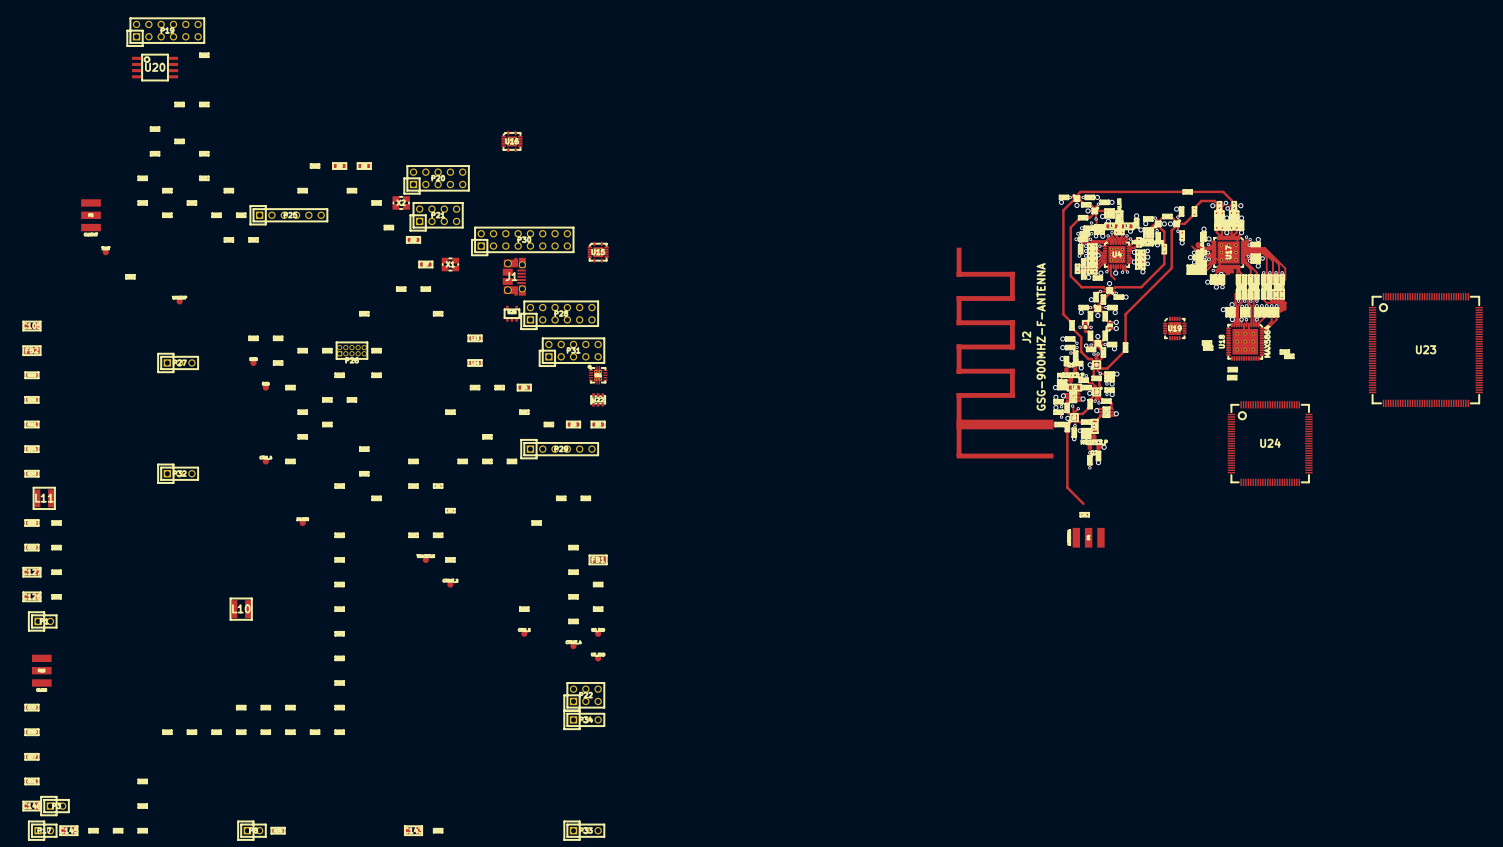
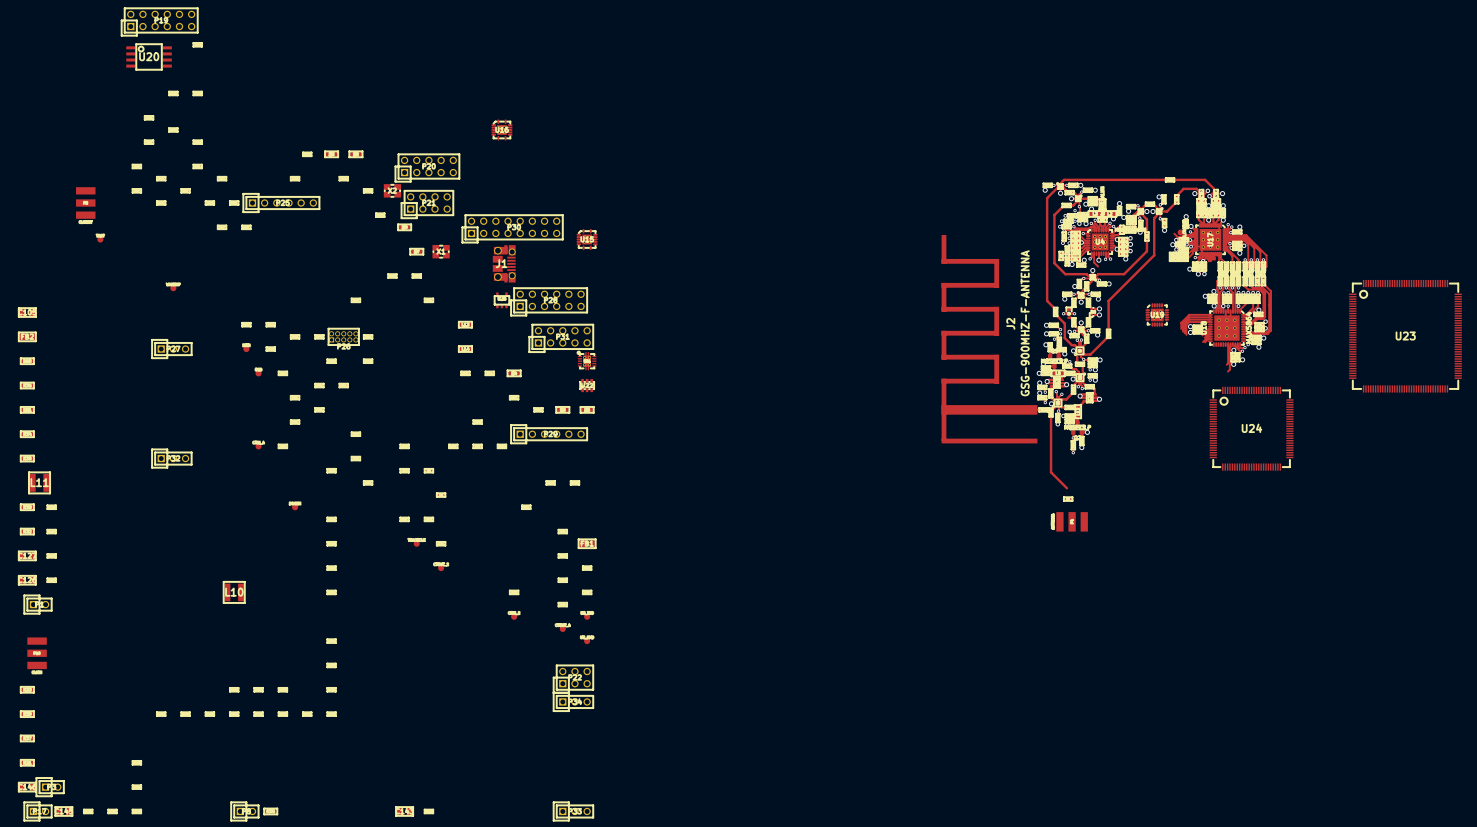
part position: (130, 276) -> (1258, 314)
track: (1276, 296) (1283, 303) (1283, 310) -> (1257, 283) (1269, 294) (1269, 329) (1266, 332) (1243, 331)
track: (1282, 296) (1285, 302) (1285, 309) -> (1263, 283) (1270, 291) (1270, 330) (1267, 334) (1247, 334)
track: (1282, 304) (1282, 311) -> (1263, 291) (1265, 292) (1265, 317) (1257, 319) (1251, 324) (1243, 324)
track: (1280, 305) (1280, 311) -> (1261, 291) (1263, 293) (1263, 316) (1256, 317) (1251, 322) (1243, 322)
via: none -> (1258, 310)
track: none -> (1210, 314) (1189, 314) (1181, 322) (1181, 328)
track: none -> (1210, 317) (1189, 317) (1183, 323) (1183, 331)
track: none -> (1210, 319) (1189, 319) (1184, 324) (1184, 333)
track: none -> (1210, 322) (1189, 322) (1186, 324) (1186, 334)
via: none -> (1265, 321)
via: none -> (1190, 326)
part: (1207, 342) -> none
track: none -> (1210, 329) (1202, 335)
via: none -> (1265, 328)
track: none -> (1210, 331) (1205, 335)
via: none -> (1190, 332)
track: none -> (1210, 334) (1204, 337)
part: (1208, 348) -> none
track: none -> (1210, 336) (1203, 341)
via: none -> (1263, 338)
track: none -> (1210, 338) (1205, 342)
part position: (1284, 352) -> (1259, 324)
part position: (1289, 356) -> (1259, 329)
track: none -> (1228, 344) (1226, 364)
track: none -> (1230, 344) (1229, 369) (1227, 371)
track: none -> (1235, 344) (1240, 351) (1242, 351)
track: none -> (1237, 344) (1239, 348) (1245, 347)
via: none -> (1248, 344)
via: none -> (1245, 347)
via: none -> (1258, 347)
via: none -> (1233, 350)
via: none -> (1242, 351)
part position: (1232, 369) -> (1256, 337)
part: none -> (1233, 357)
part: none -> (1237, 357)
via: none -> (1242, 359)
part position: (1232, 377) -> (1256, 342)
via: none -> (1233, 364)
part position: (450, 412) -> (1197, 331)
part position: (339, 633) -> (1197, 327)

